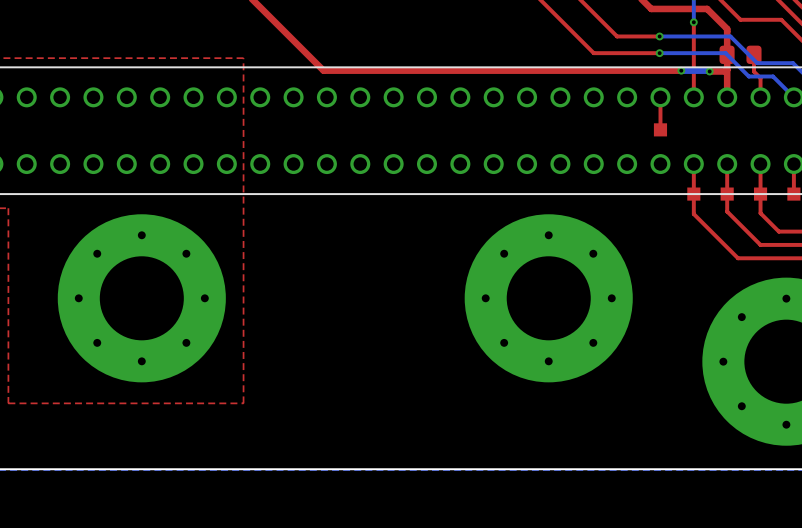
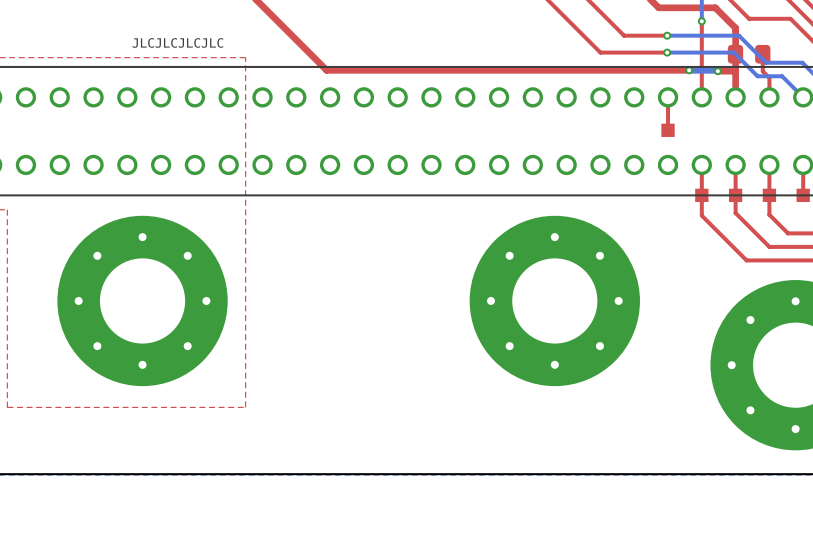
text: none -> JLCJLCJLCJLC (177, 42)

